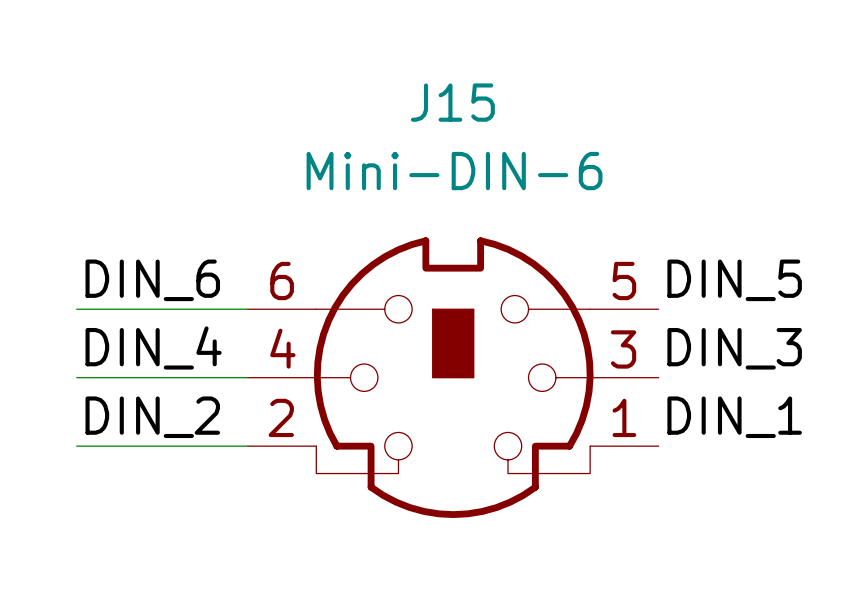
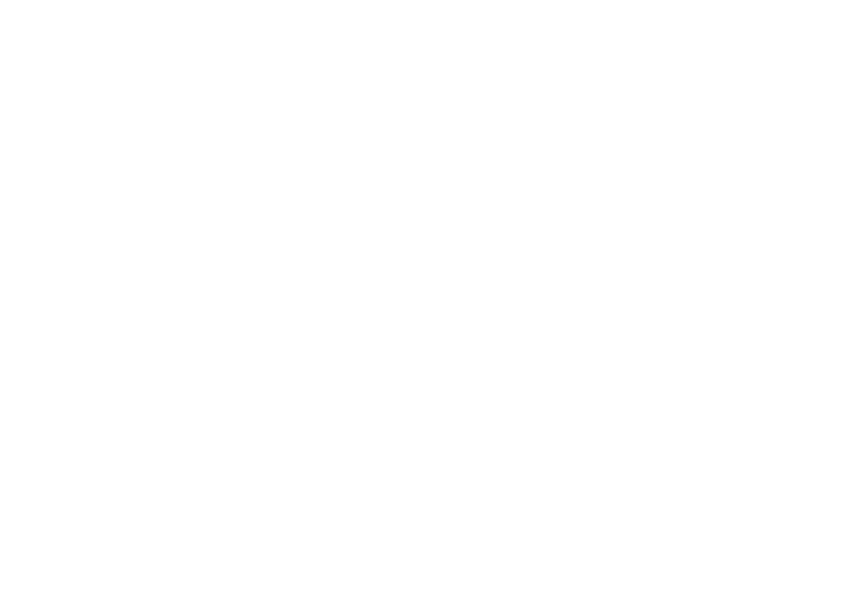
label: DIN_6 (152, 280) -> none
label: DIN_5 (734, 280) -> none
wire: (76, 309) (247, 309) -> none
label: DIN_4 (153, 347) -> none
label: DIN_3 (734, 348) -> none
wire: (76, 377) (247, 377) -> none
J15: Mini-DIN-6 (453, 377) -> none
label: DIN_2 (152, 417) -> none
label: DIN_1 (734, 417) -> none
wire: (76, 446) (247, 446) -> none

